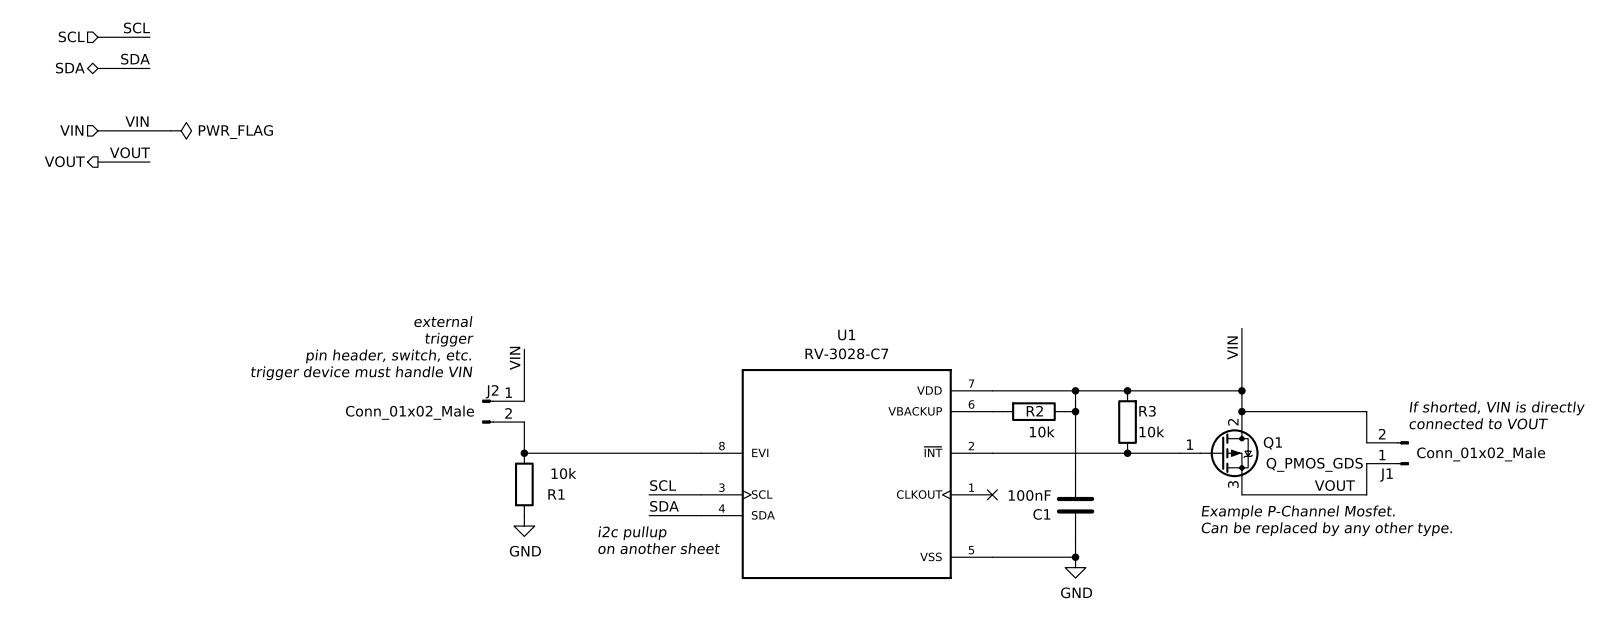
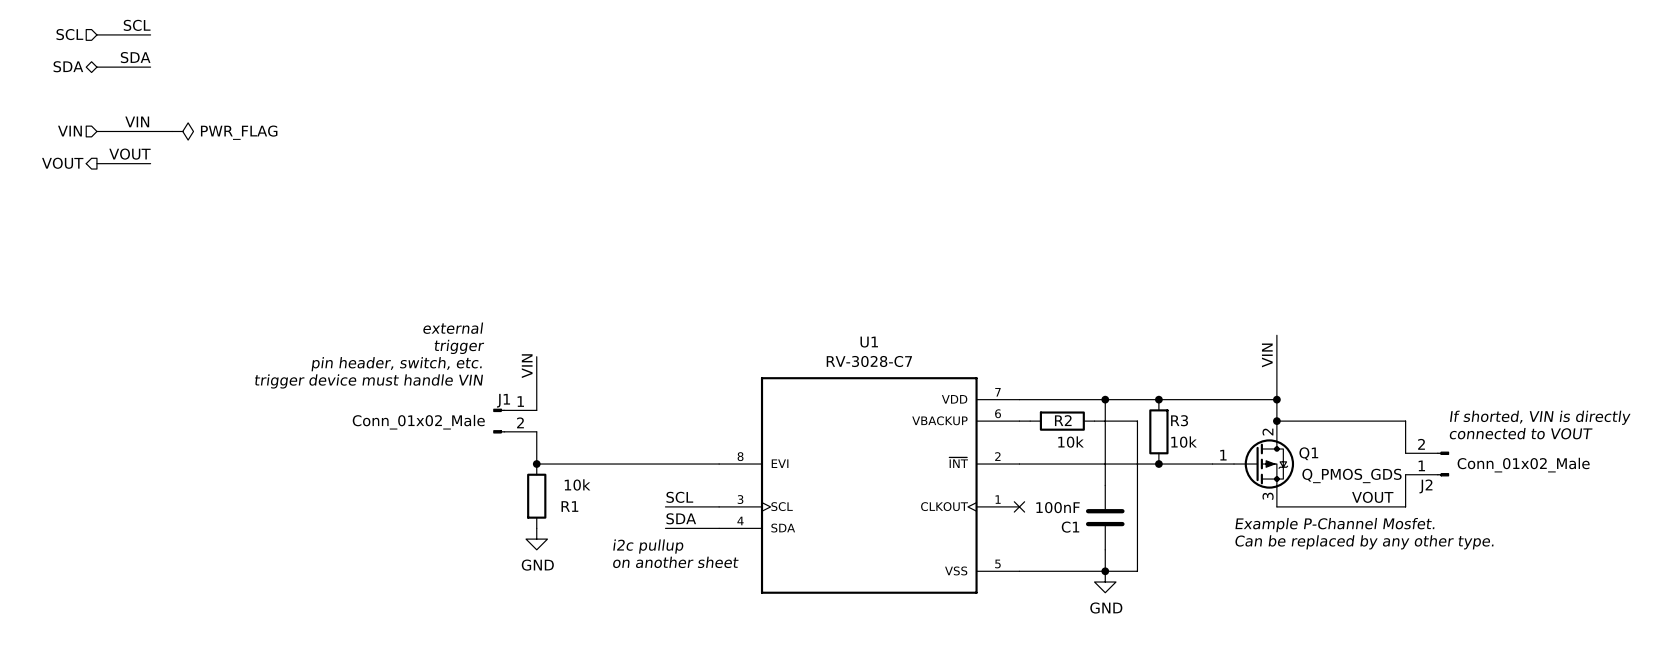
J2 name: J2 (492, 391) -> J1 (503, 400)
wire: none -> (1105, 421) (1137, 421) (1137, 571) (1105, 571)
junction: (1075, 411) -> none
J1 name: J1 (1386, 475) -> J2 (1425, 486)

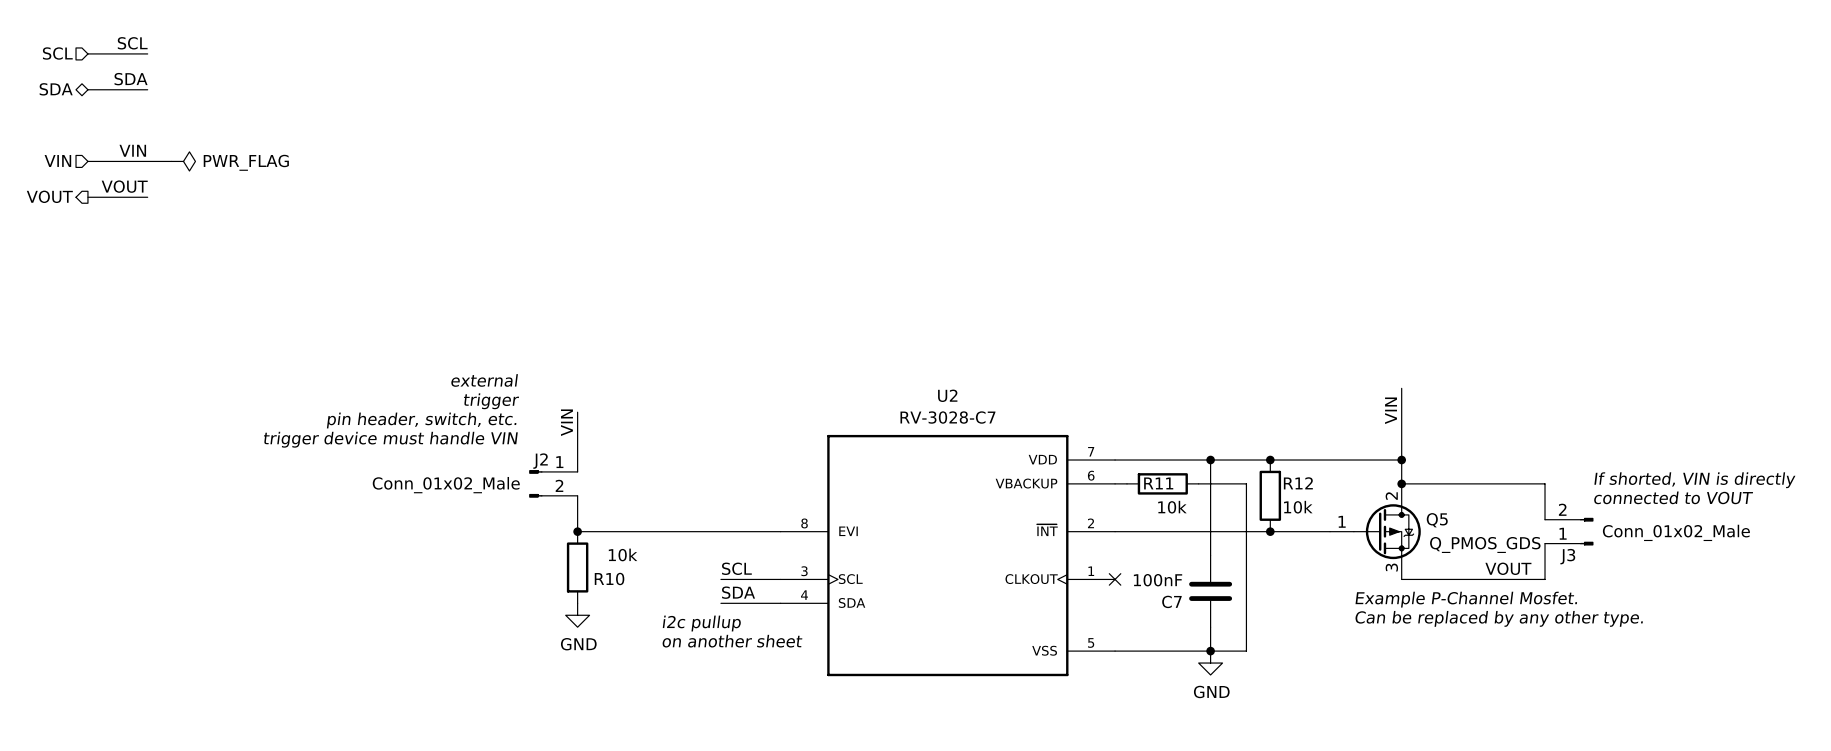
U1 name: U1 (869, 342) -> U2 (947, 395)
J1 name: J1 (503, 400) -> J2 (540, 461)
R2 name: R2 (1063, 420) -> R11 (1158, 483)
R3 name: R3 (1179, 420) -> R12 (1298, 483)
Q1 name: Q1 (1308, 453) -> Q5 (1437, 520)
J2 name: J2 (1425, 486) -> J3 (1567, 556)
R1 name: R1 (569, 506) -> R10 (609, 579)
C1 name: C1 (1070, 527) -> C7 (1171, 601)

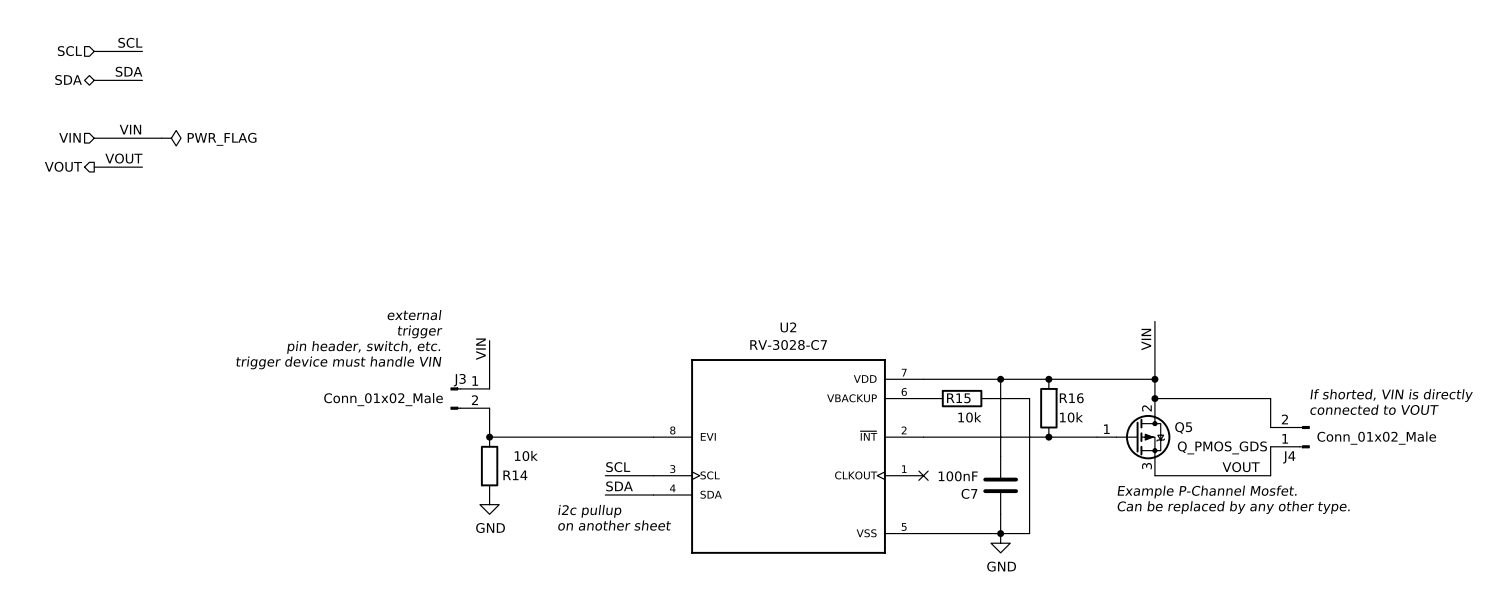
J2 name: J2 (540, 461) -> J3 (459, 380)
R11 name: R11 (1158, 483) -> R15 (958, 398)
R12 name: R12 (1298, 483) -> R16 (1071, 398)
J3 name: J3 (1567, 556) -> J4 (1289, 457)
R10 name: R10 (609, 579) -> R14 (515, 475)

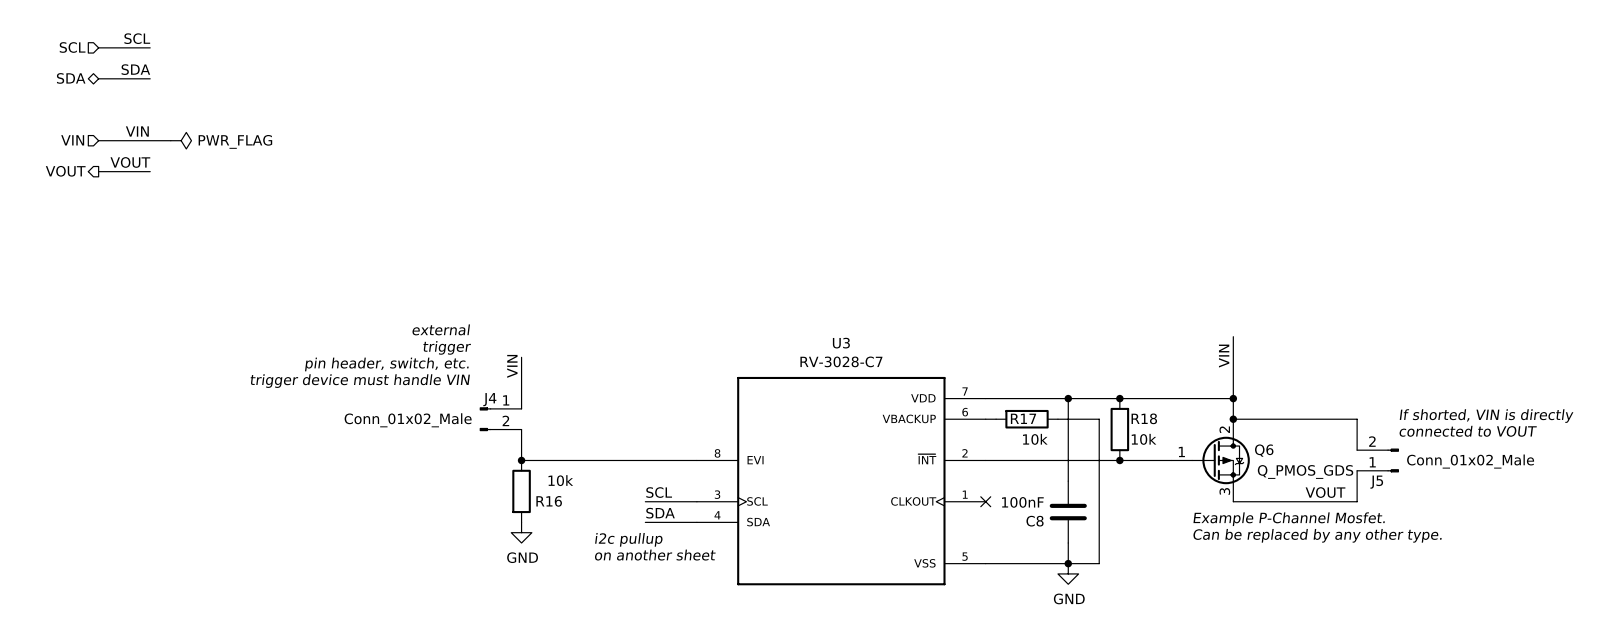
U2 name: U2 (788, 327) -> U3 (841, 343)
J3 name: J3 (459, 380) -> J4 (489, 399)
R15 name: R15 (958, 398) -> R17 (1023, 418)
R16 name: R16 (1071, 398) -> R18 (1144, 418)
Q5 name: Q5 (1183, 427) -> Q6 (1264, 450)
J4 name: J4 (1289, 457) -> J5 (1376, 482)
R14 name: R14 (515, 475) -> R16 (549, 501)
C7 name: C7 (969, 493) -> C8 (1035, 521)

